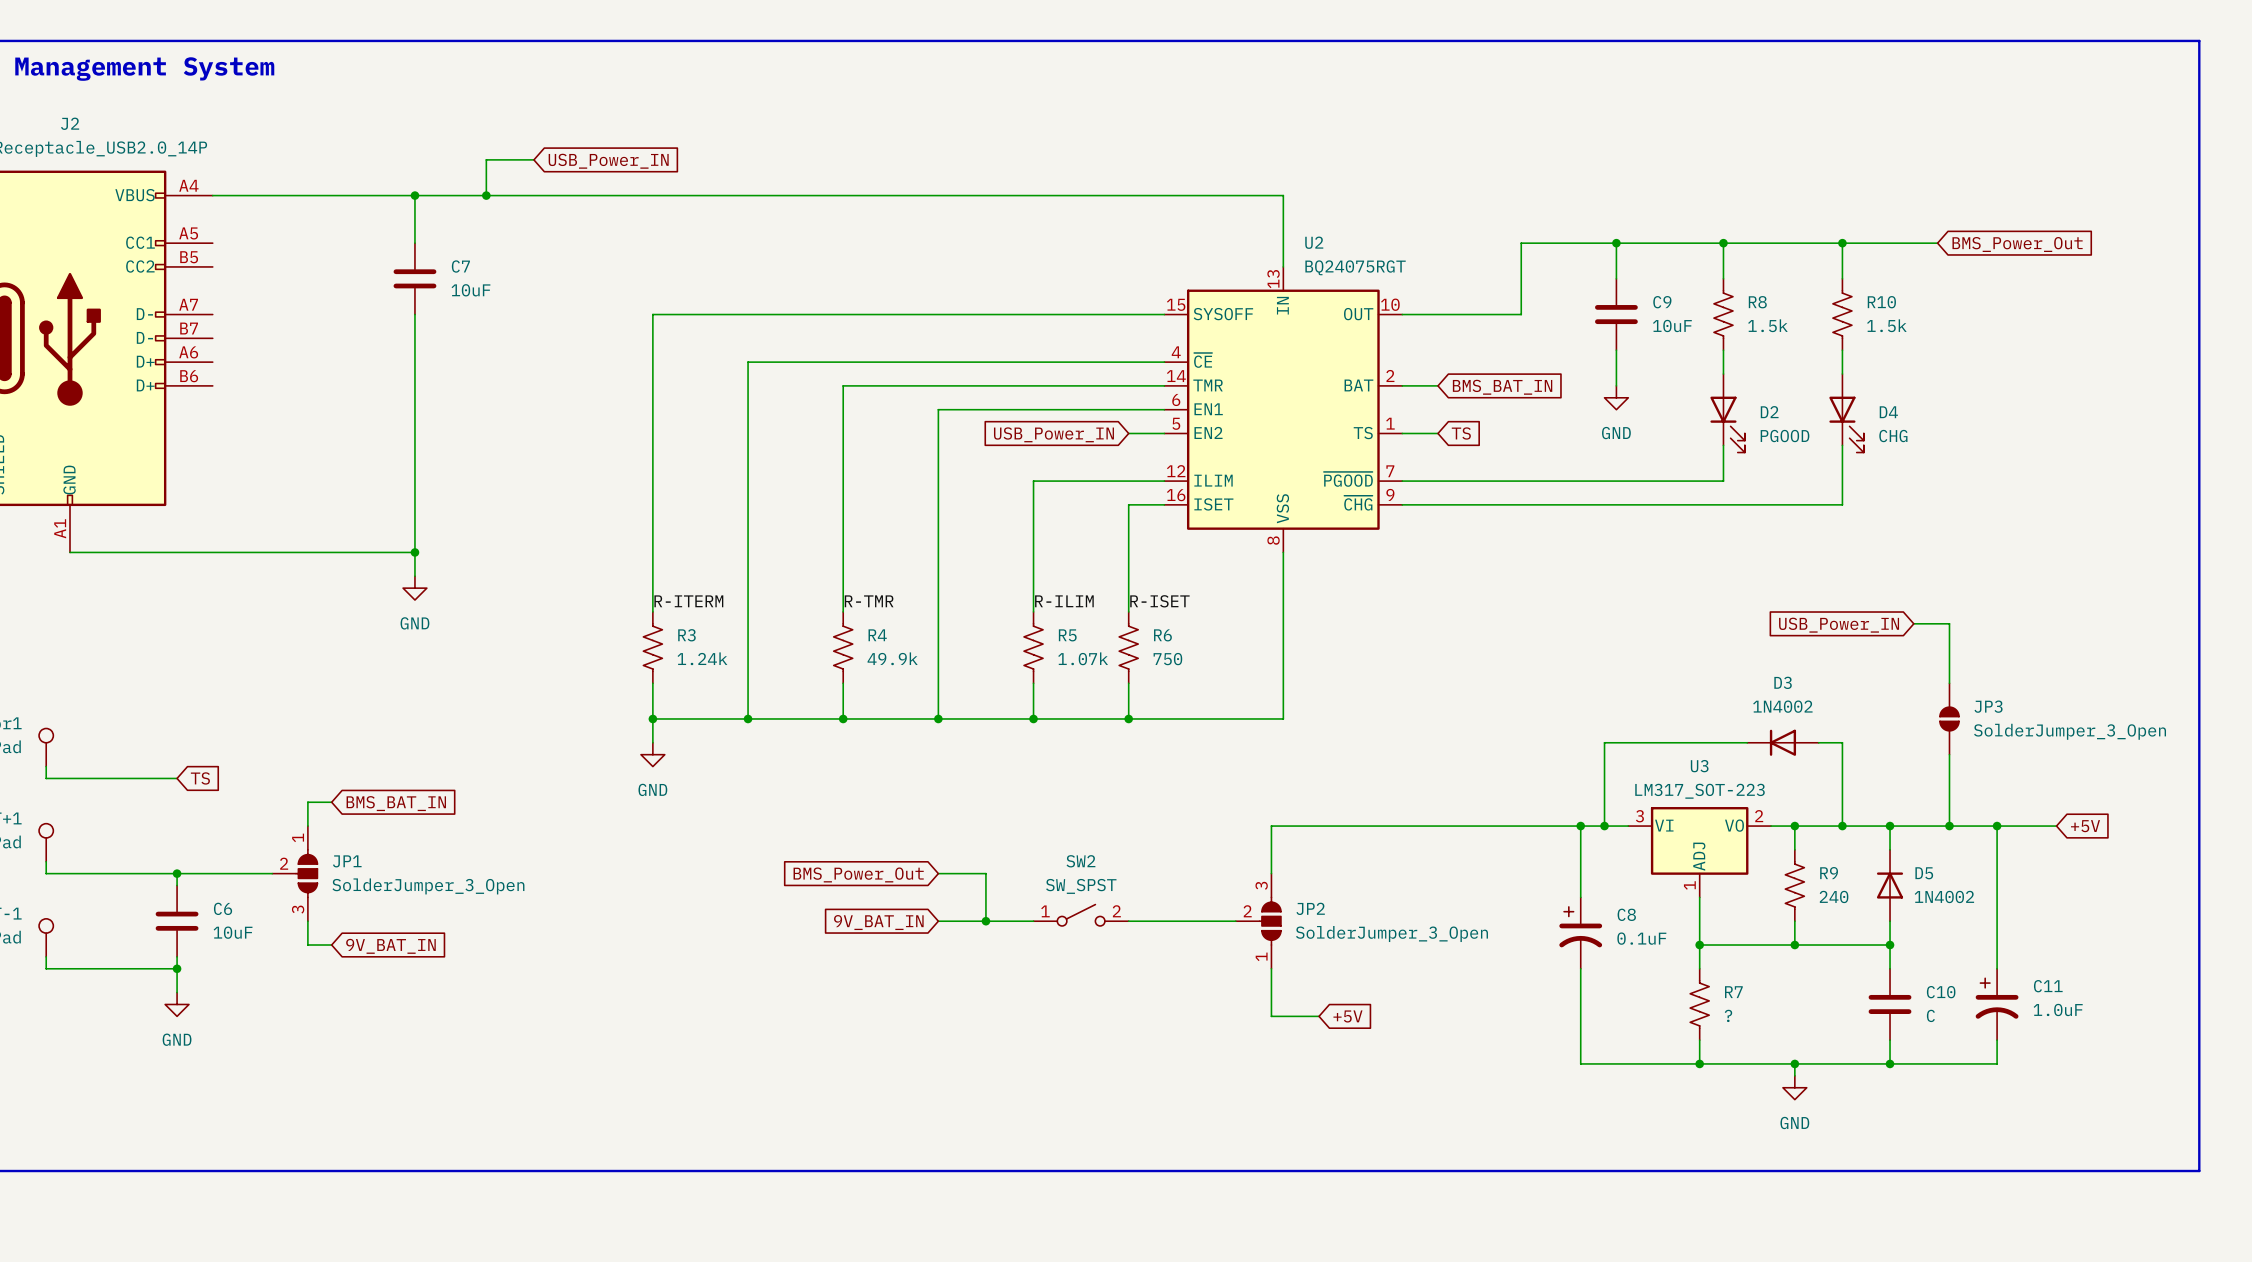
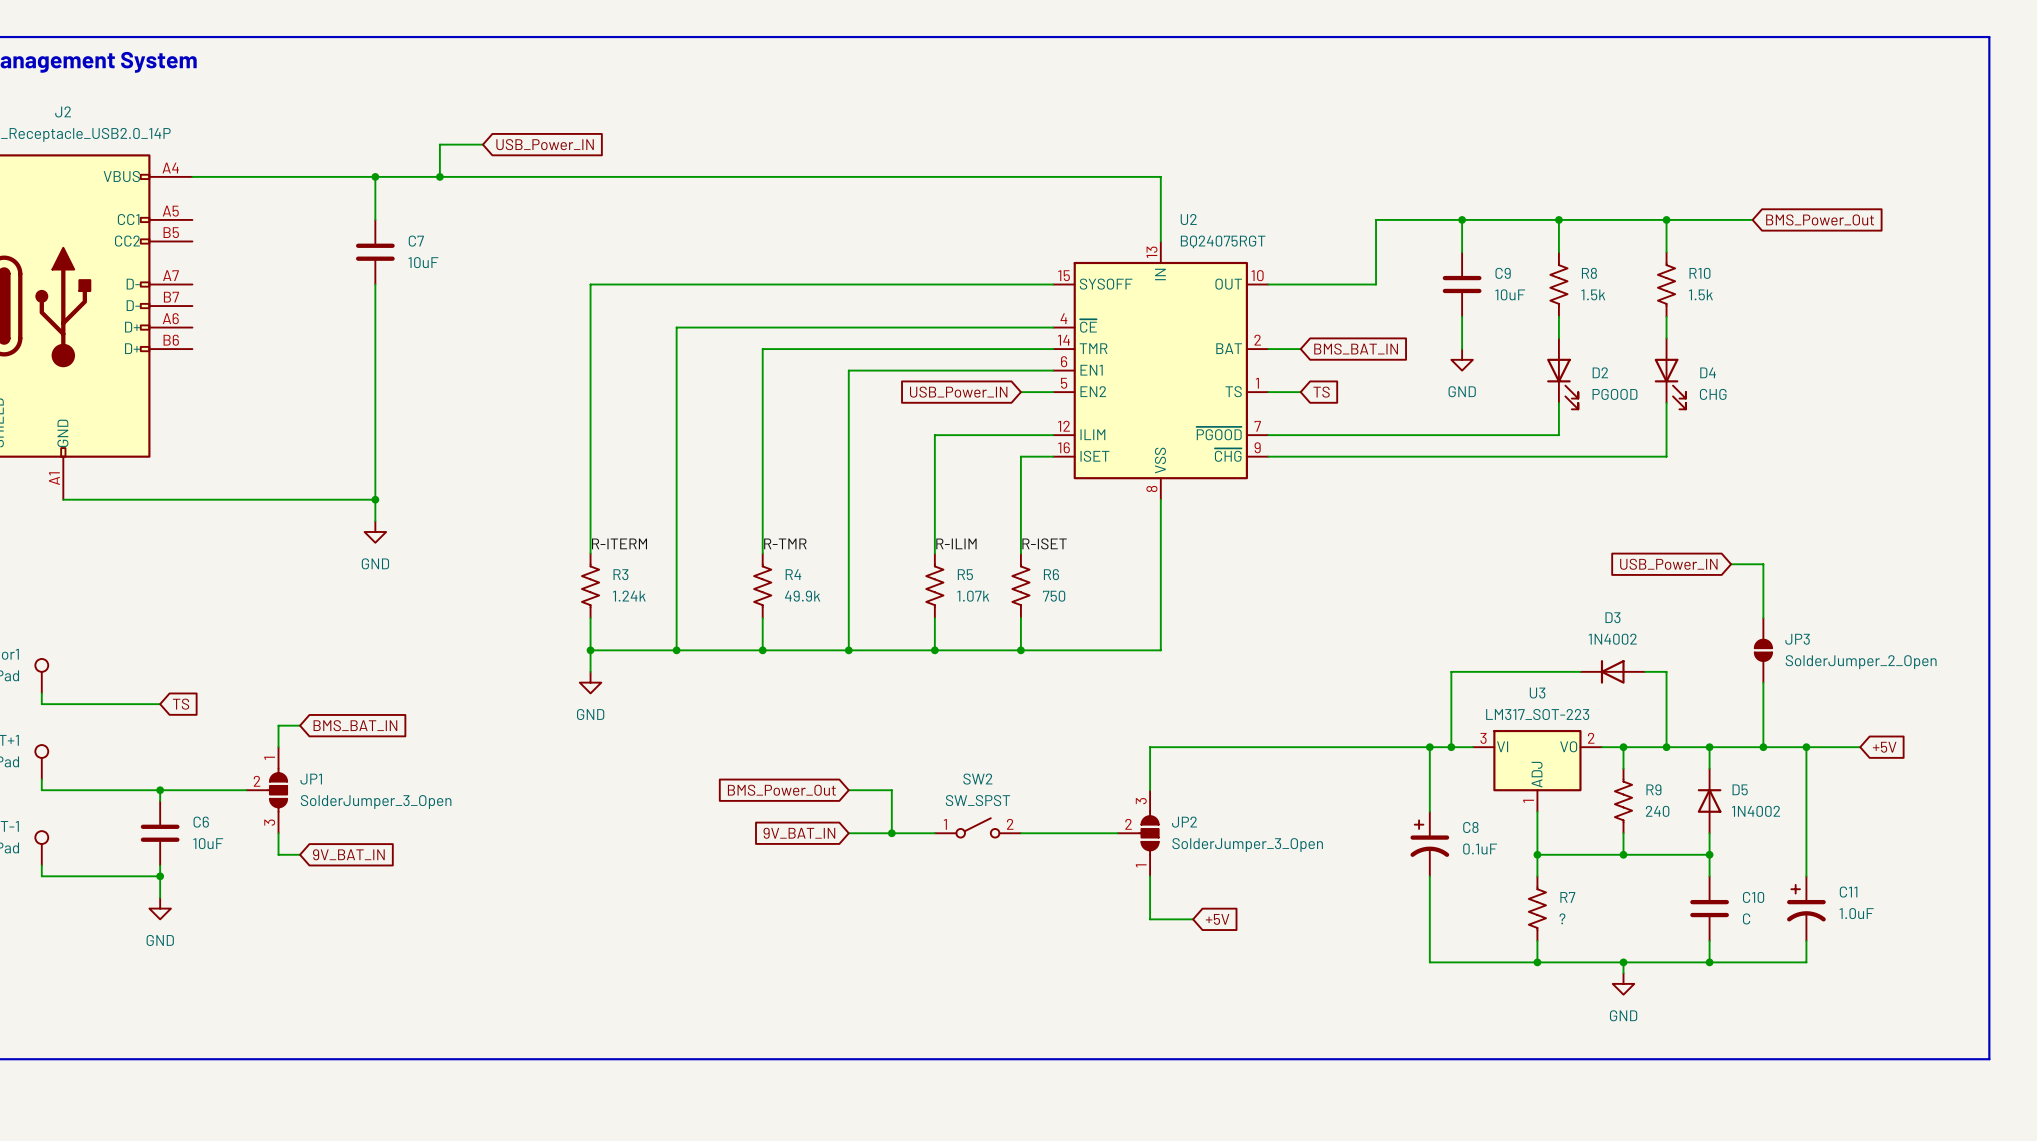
JP3 value: SolderJumper_3_Open (2070, 731) -> SolderJumper_2_Open (1861, 662)

